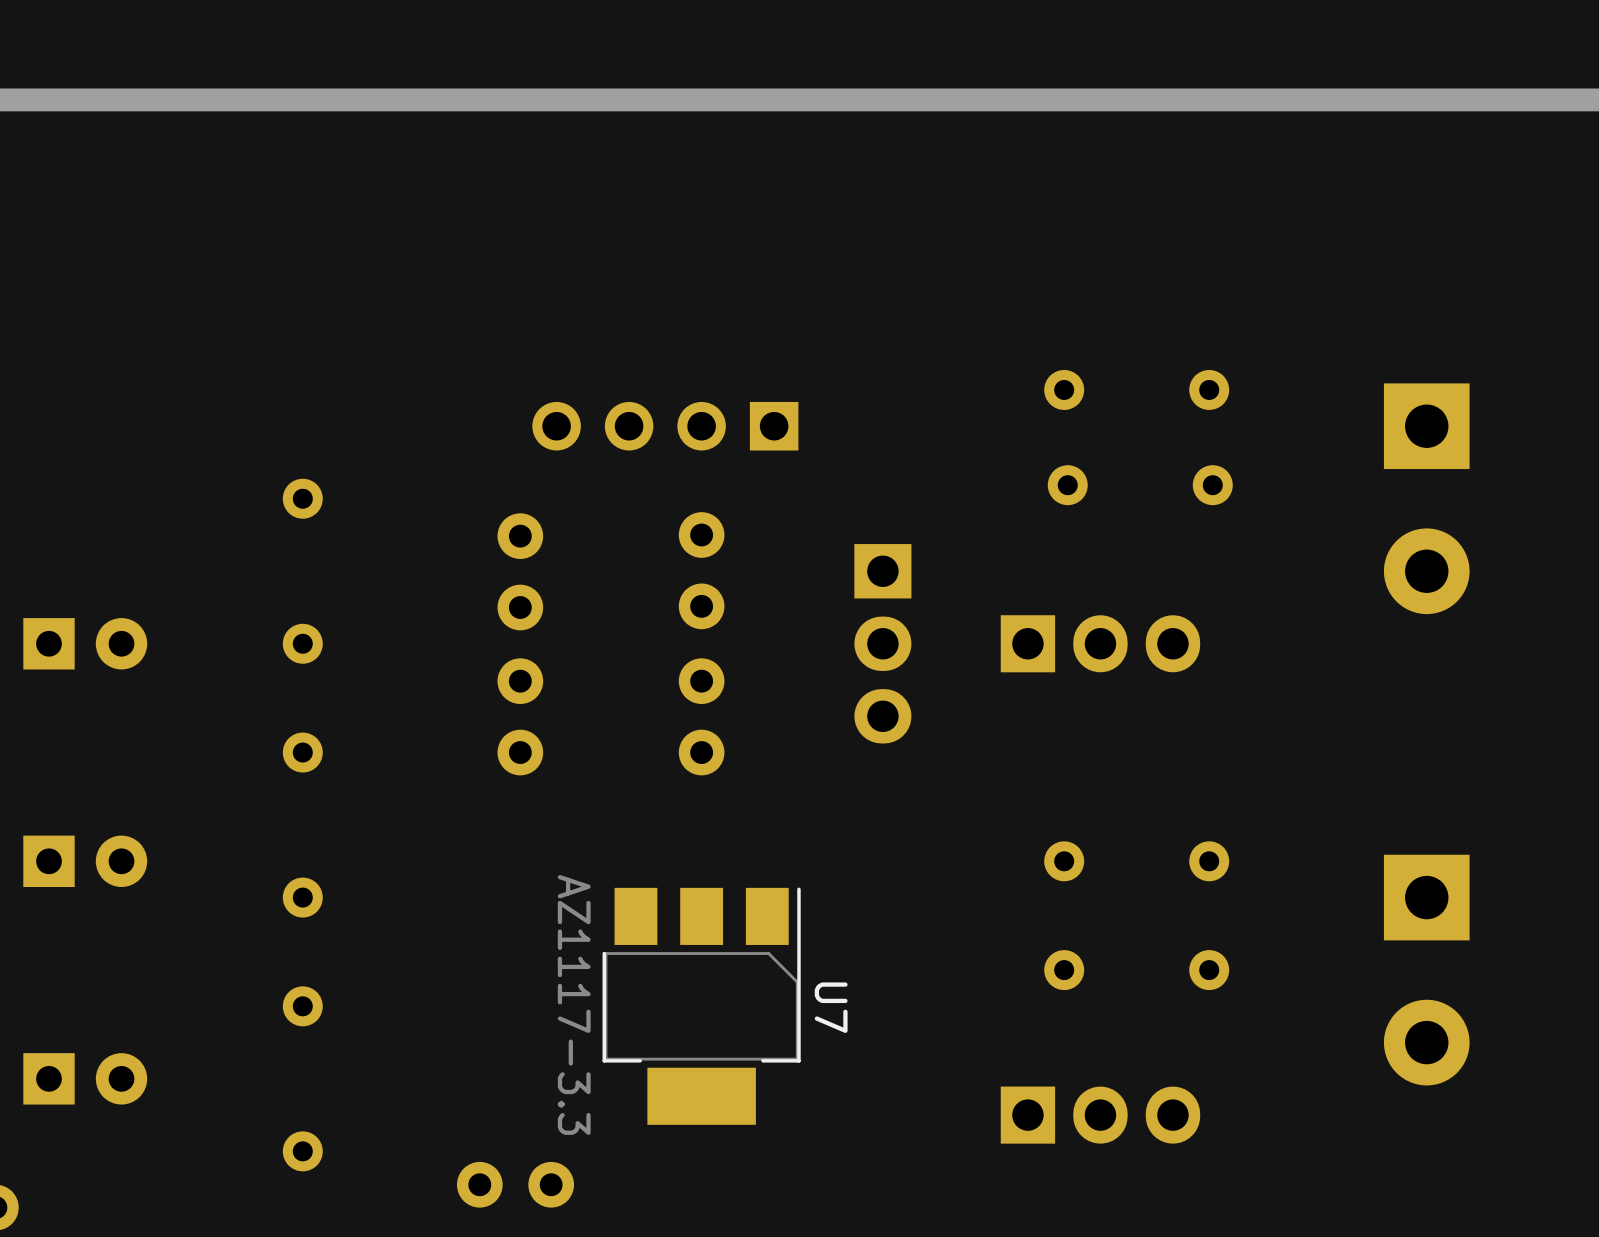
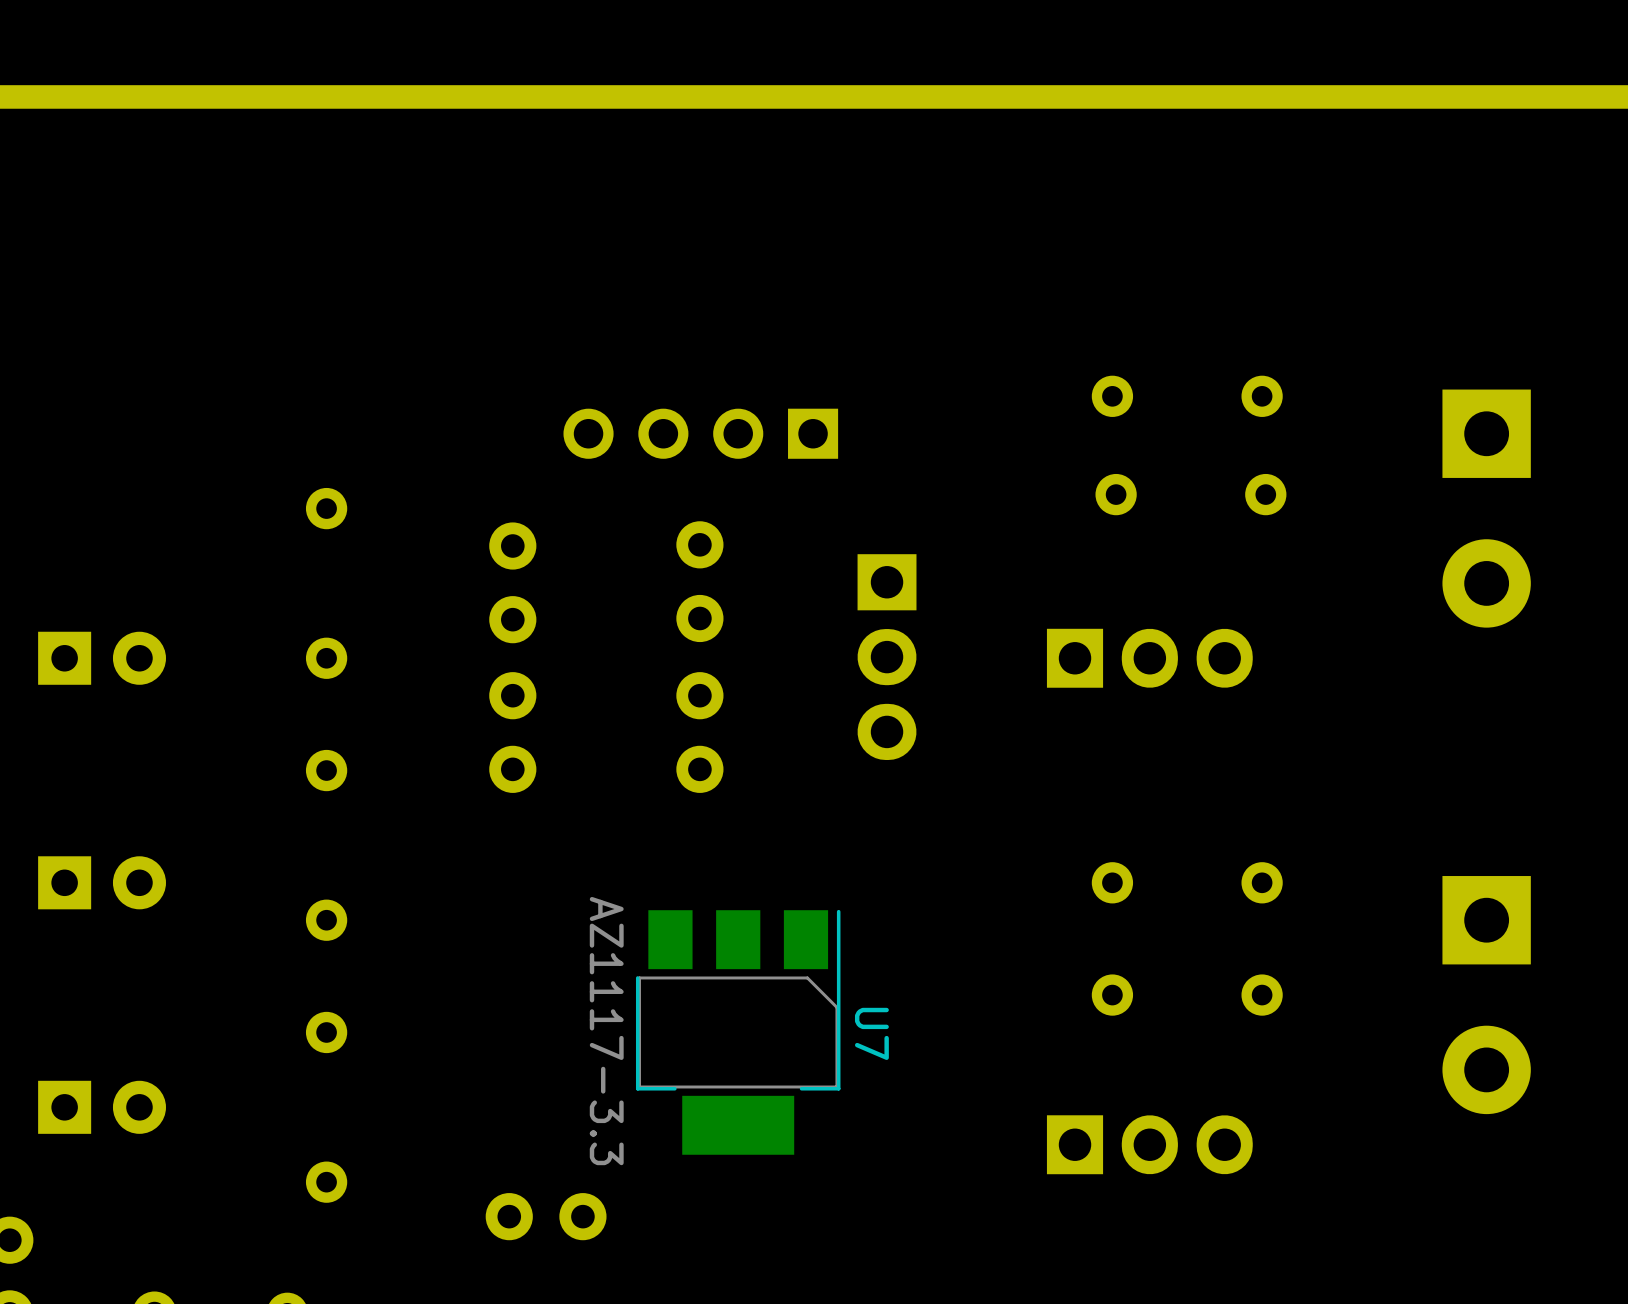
part position: (701, 570) -> (699, 581)
part position: (520, 571) -> (512, 582)
part position: (882, 643) -> (887, 657)
part position: (520, 716) -> (512, 732)
part position: (701, 716) -> (699, 732)

